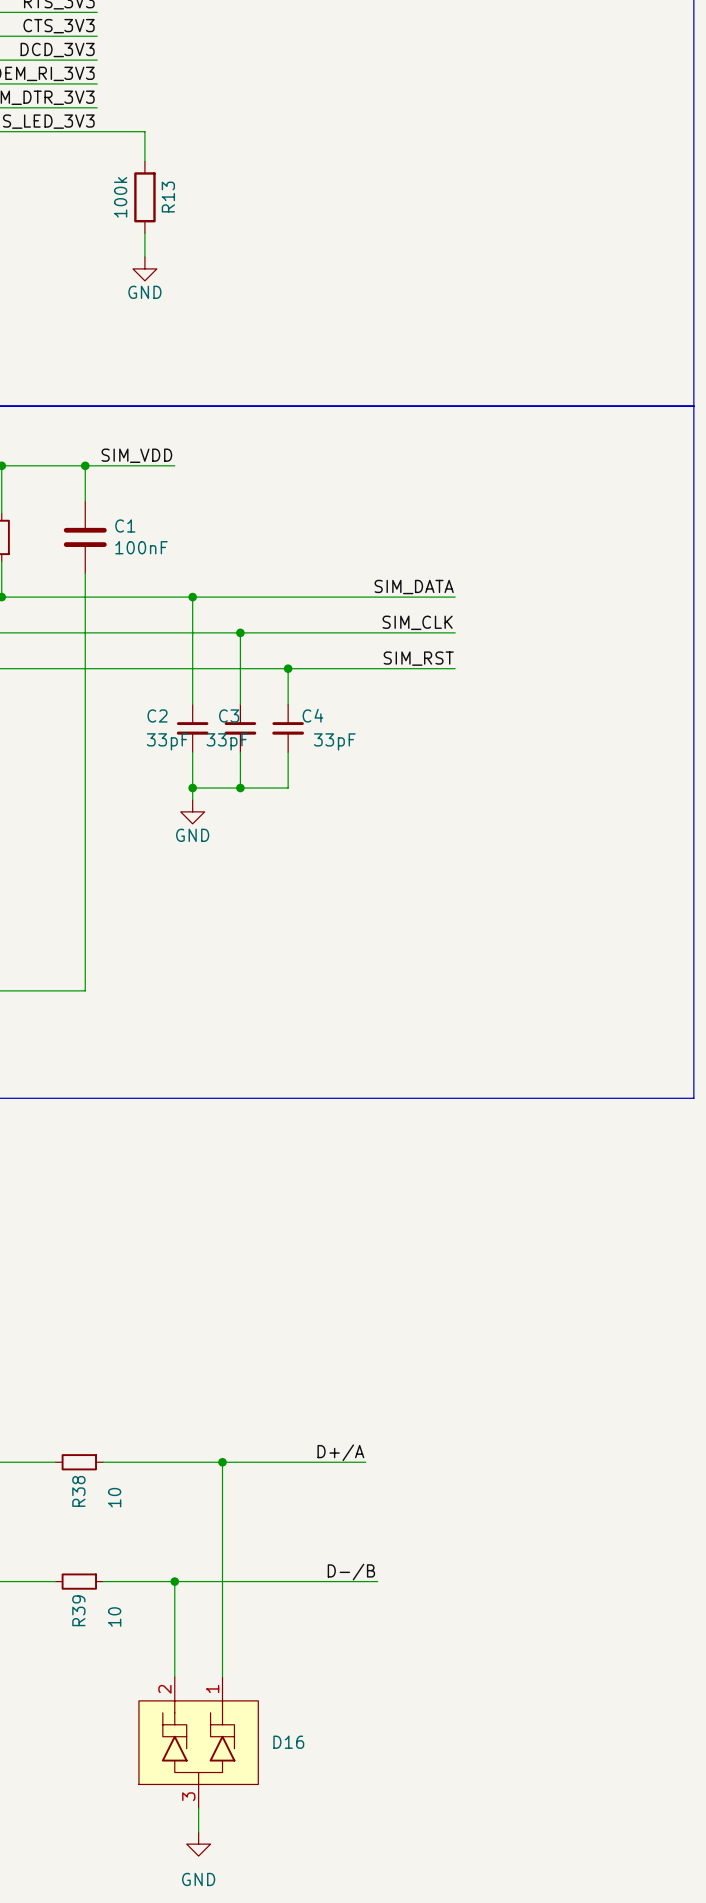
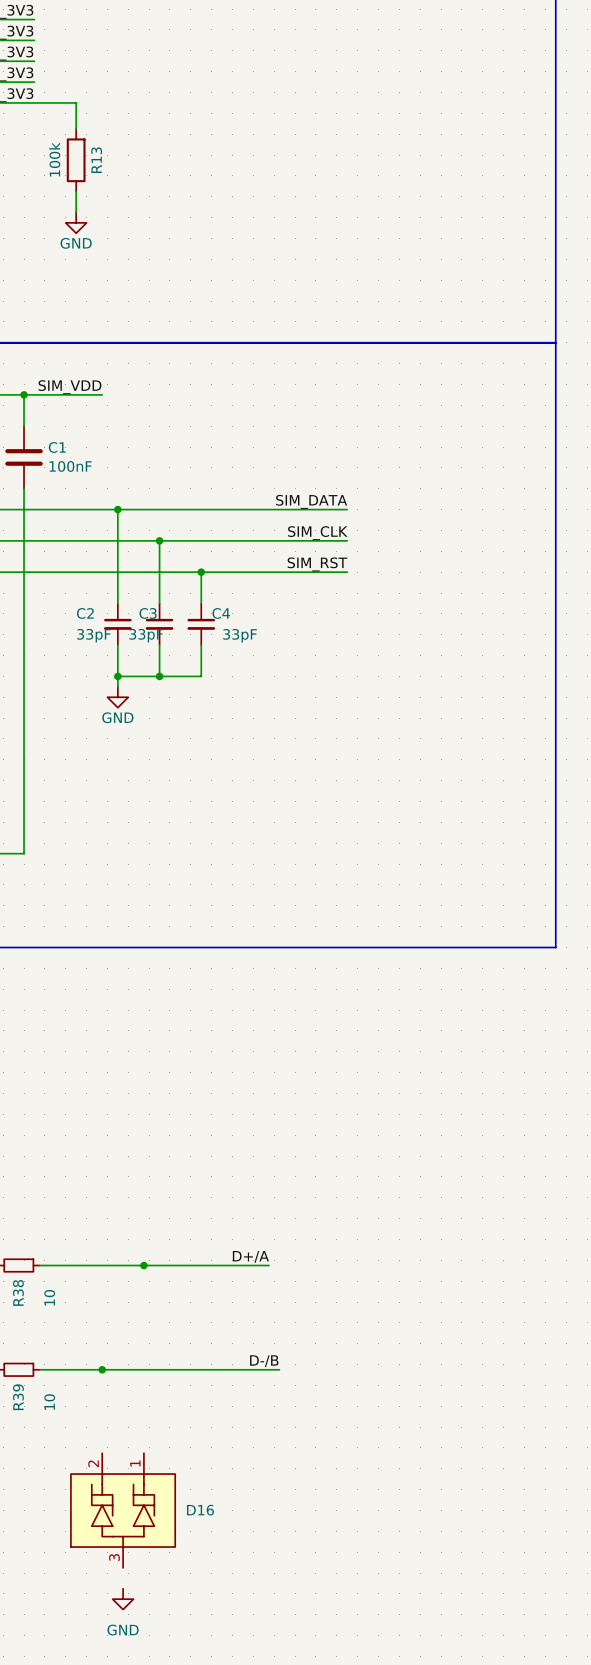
wire: (222, 1462) (222, 1677) -> none
wire: (174, 1581) (174, 1677) -> none
wire: (198, 1808) (198, 1832) -> none

